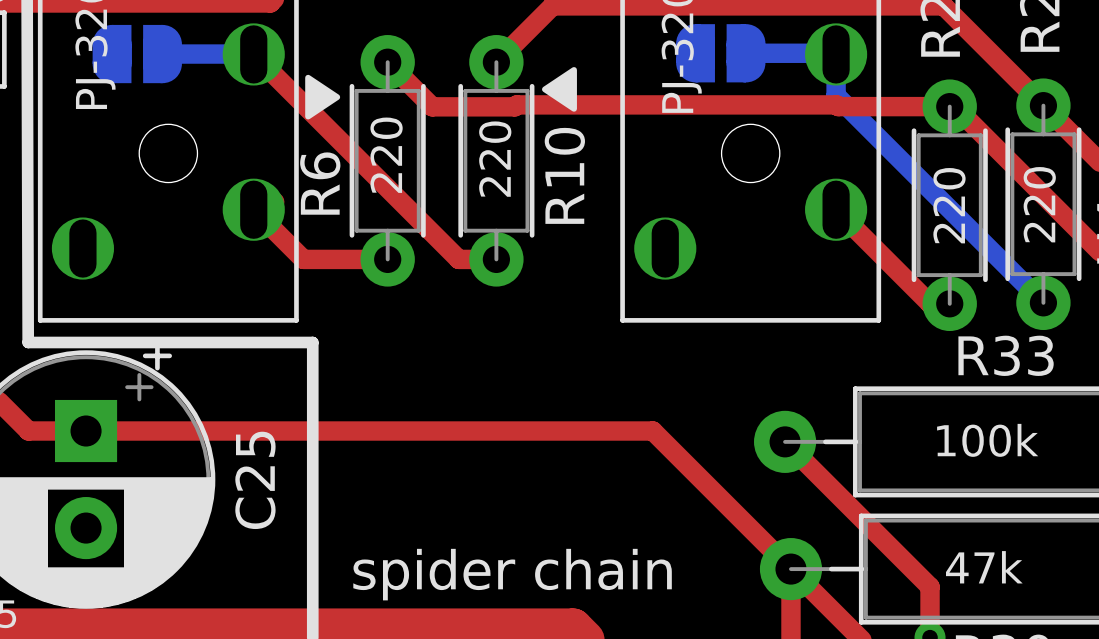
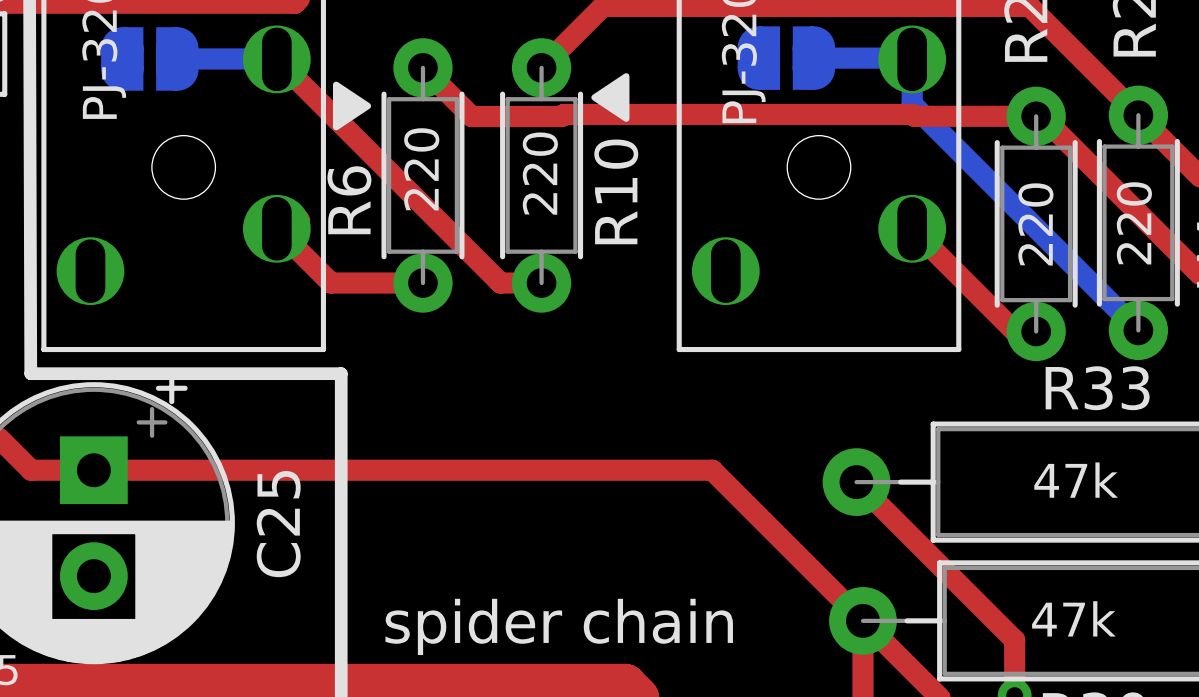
R33 value: 100k (987, 440) -> 47k (1076, 480)

